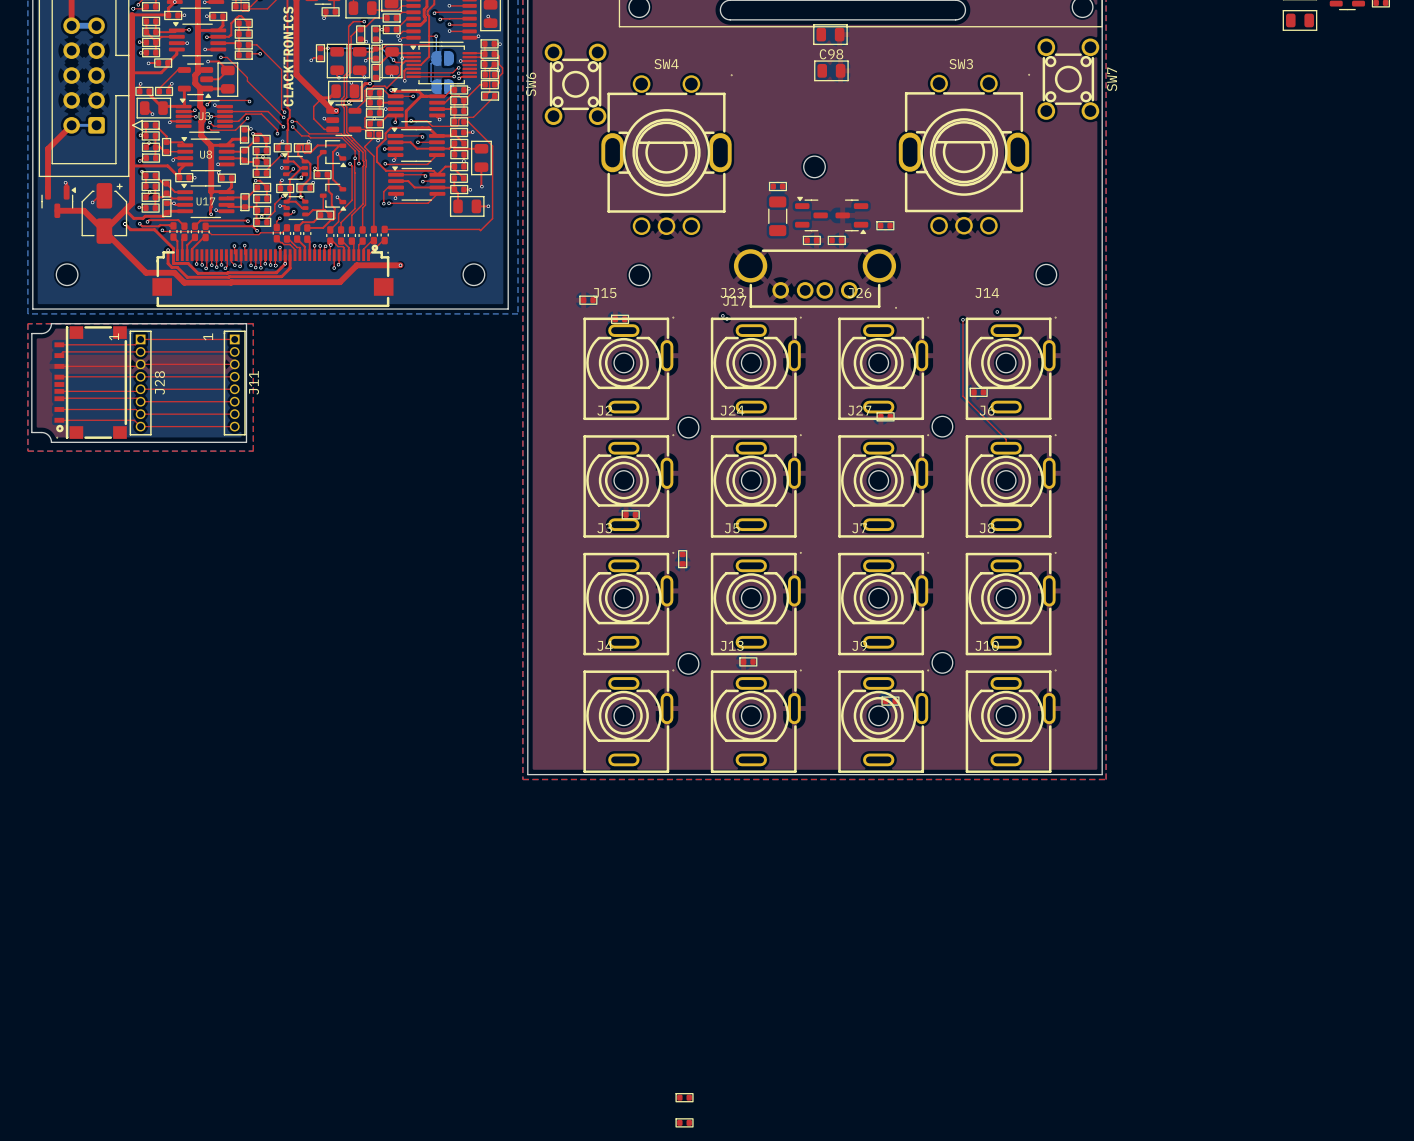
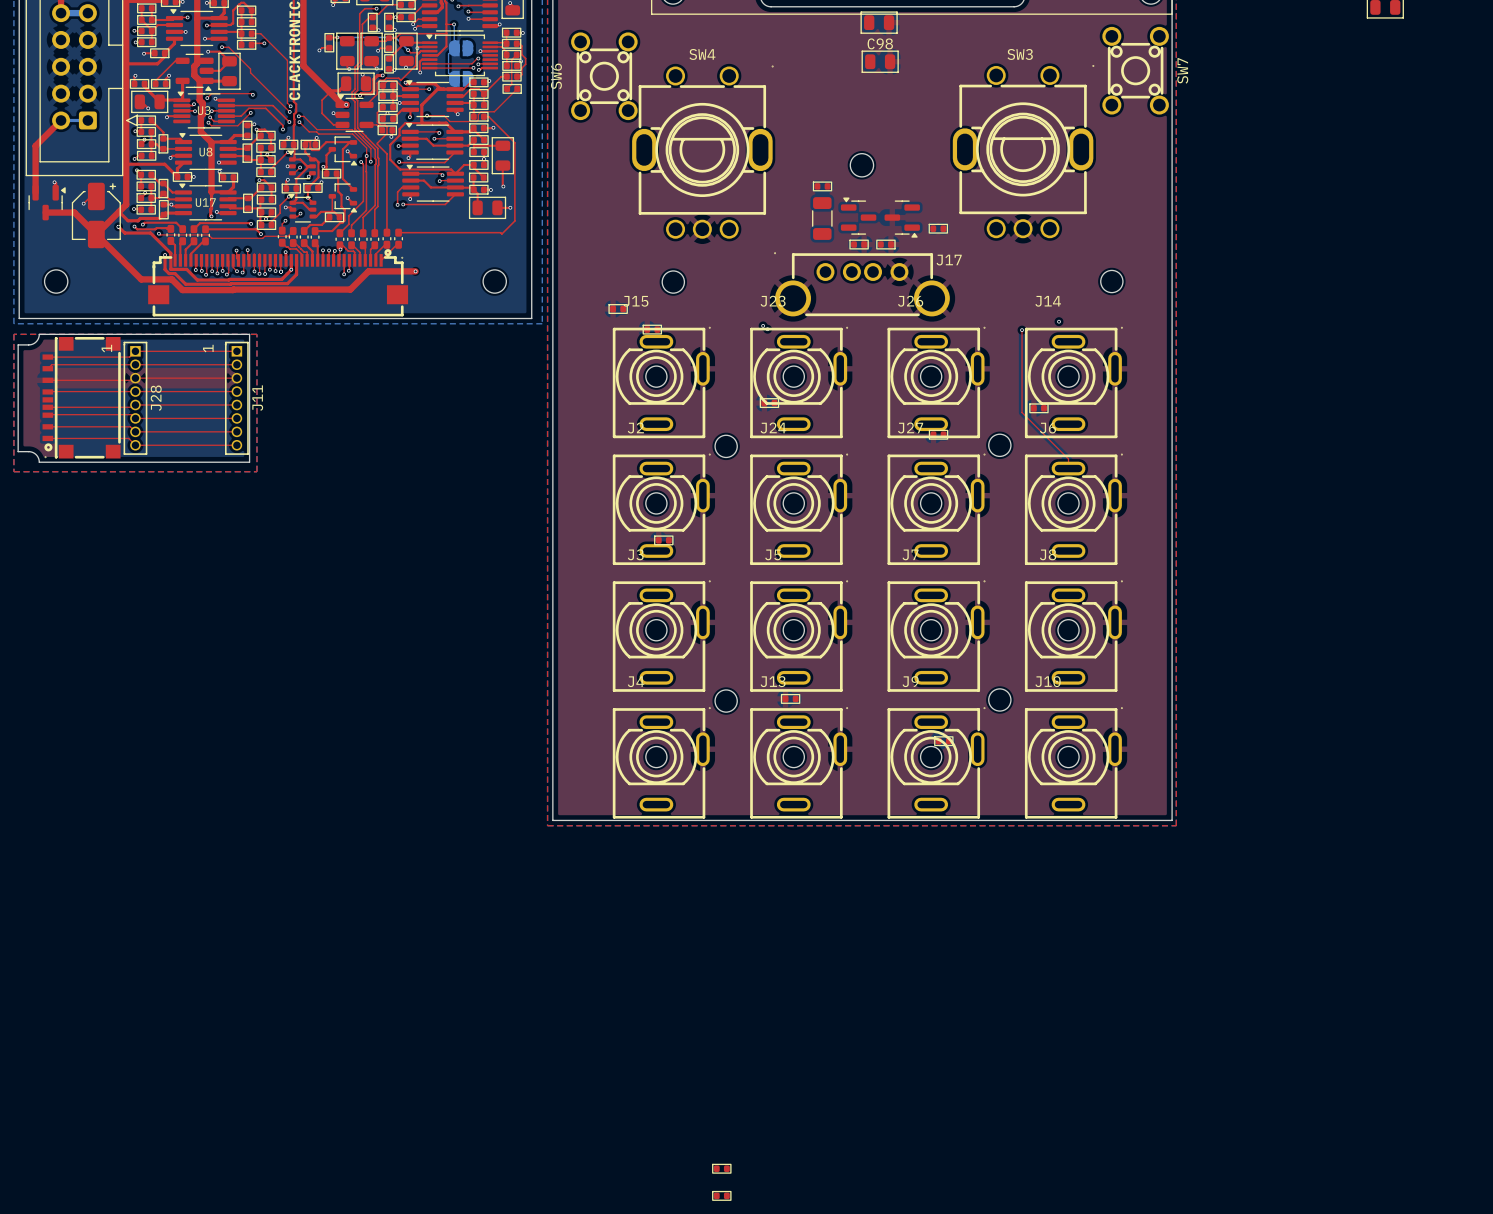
J17 rotation: 0° (815, 278) -> 180° (862, 284)
part rotation: 0° (682, 559) -> 90° clockwise (769, 403)
part position: (682, 559) -> (769, 403)

